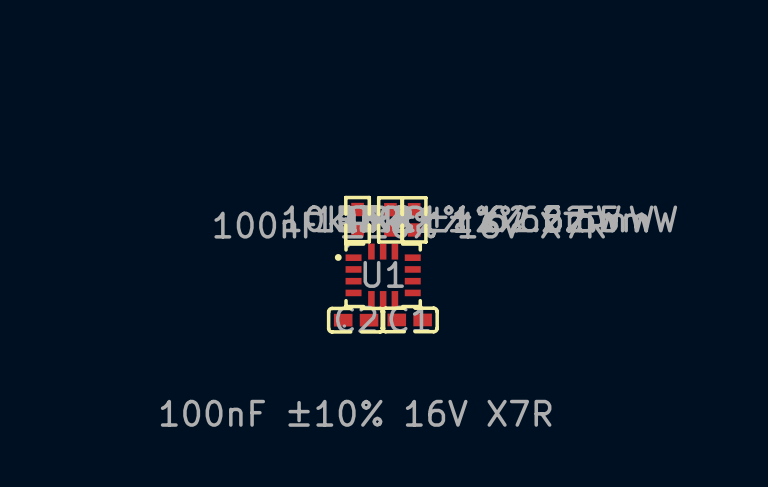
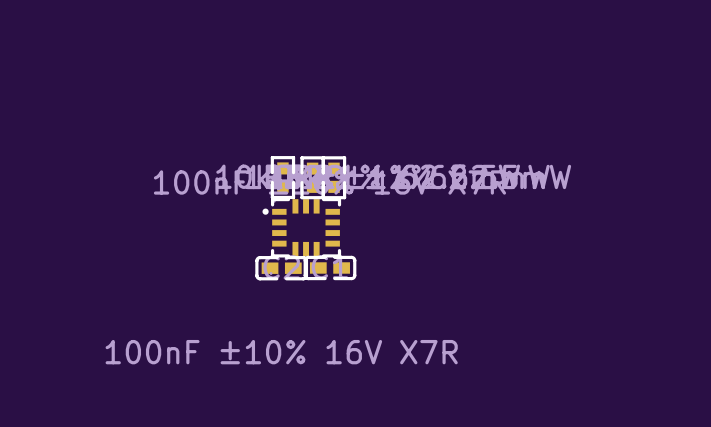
U1 name: U1 (383, 274) -> none

